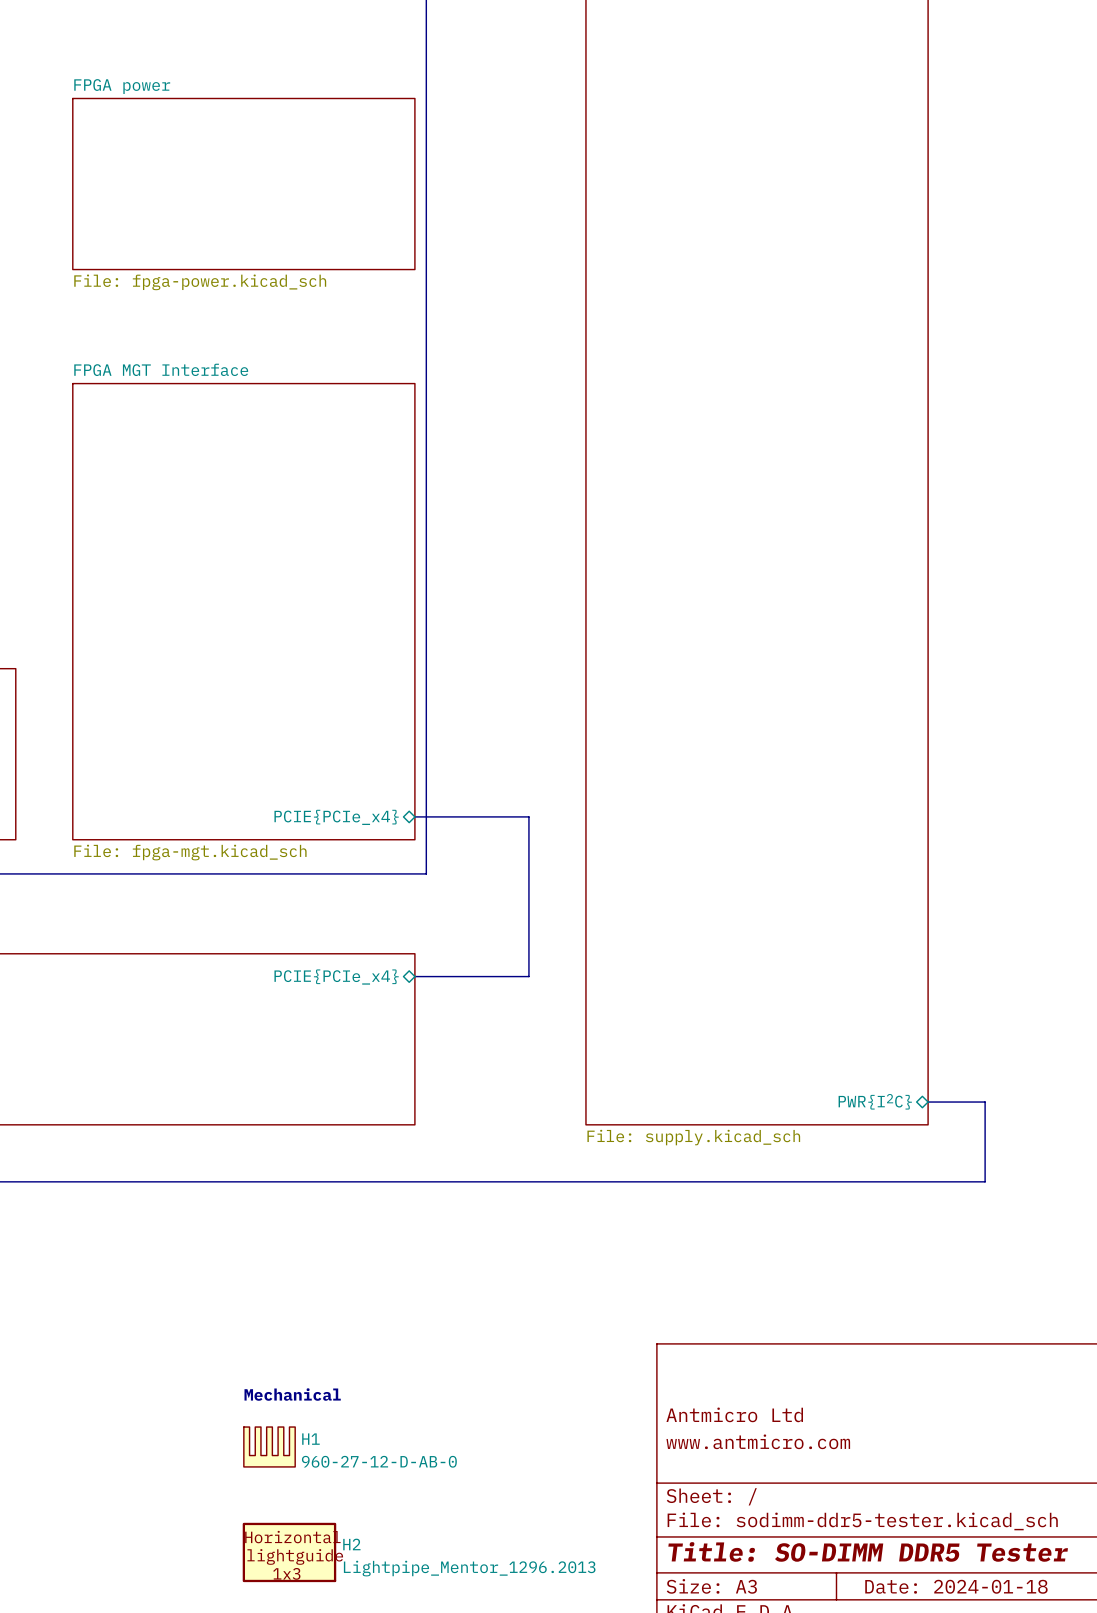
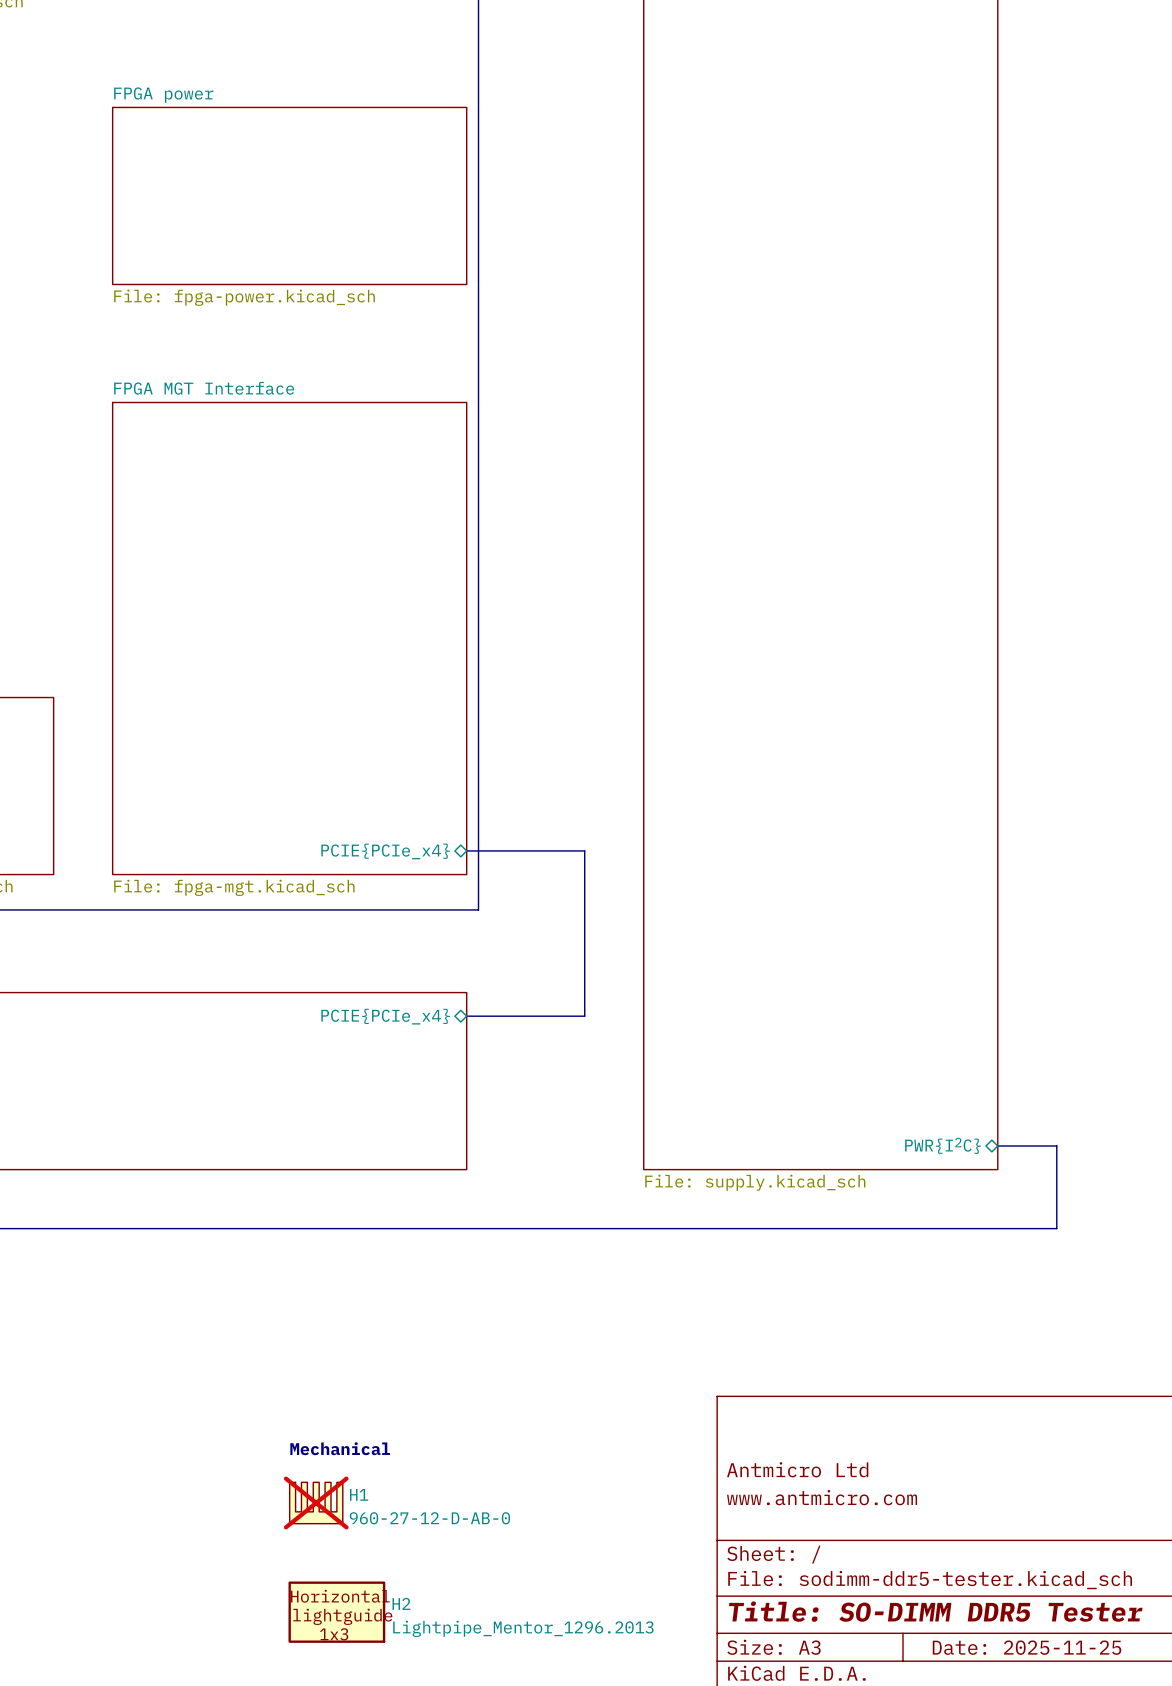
H1 do-not-place cross: none -> (316, 1503)
title block: Date: 2024-01-18 (956, 1586) -> Date: 2025-11-25 (1027, 1647)

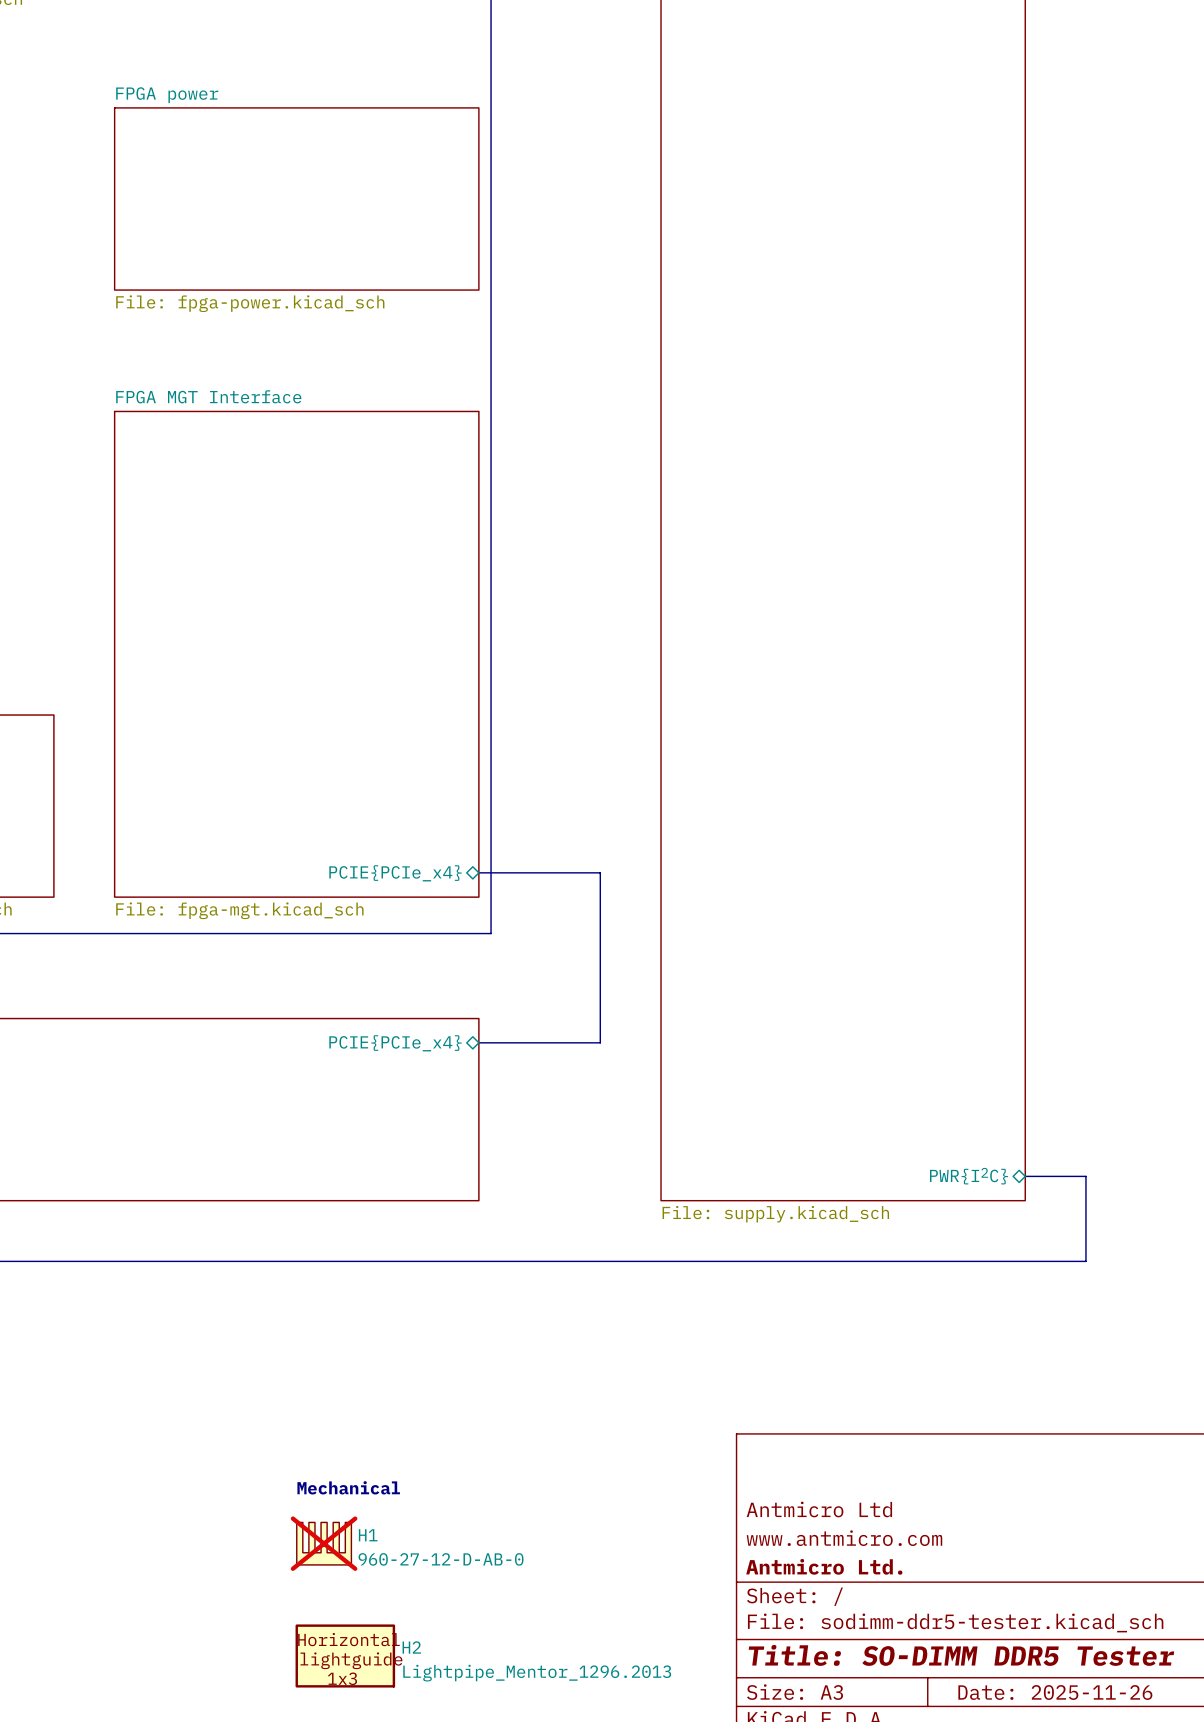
title block: none -> Antmicro Ltd. (824, 1566)
title block: Date: 2025-11-25 (1027, 1647) -> Date: 2025-11-26 (1055, 1692)

